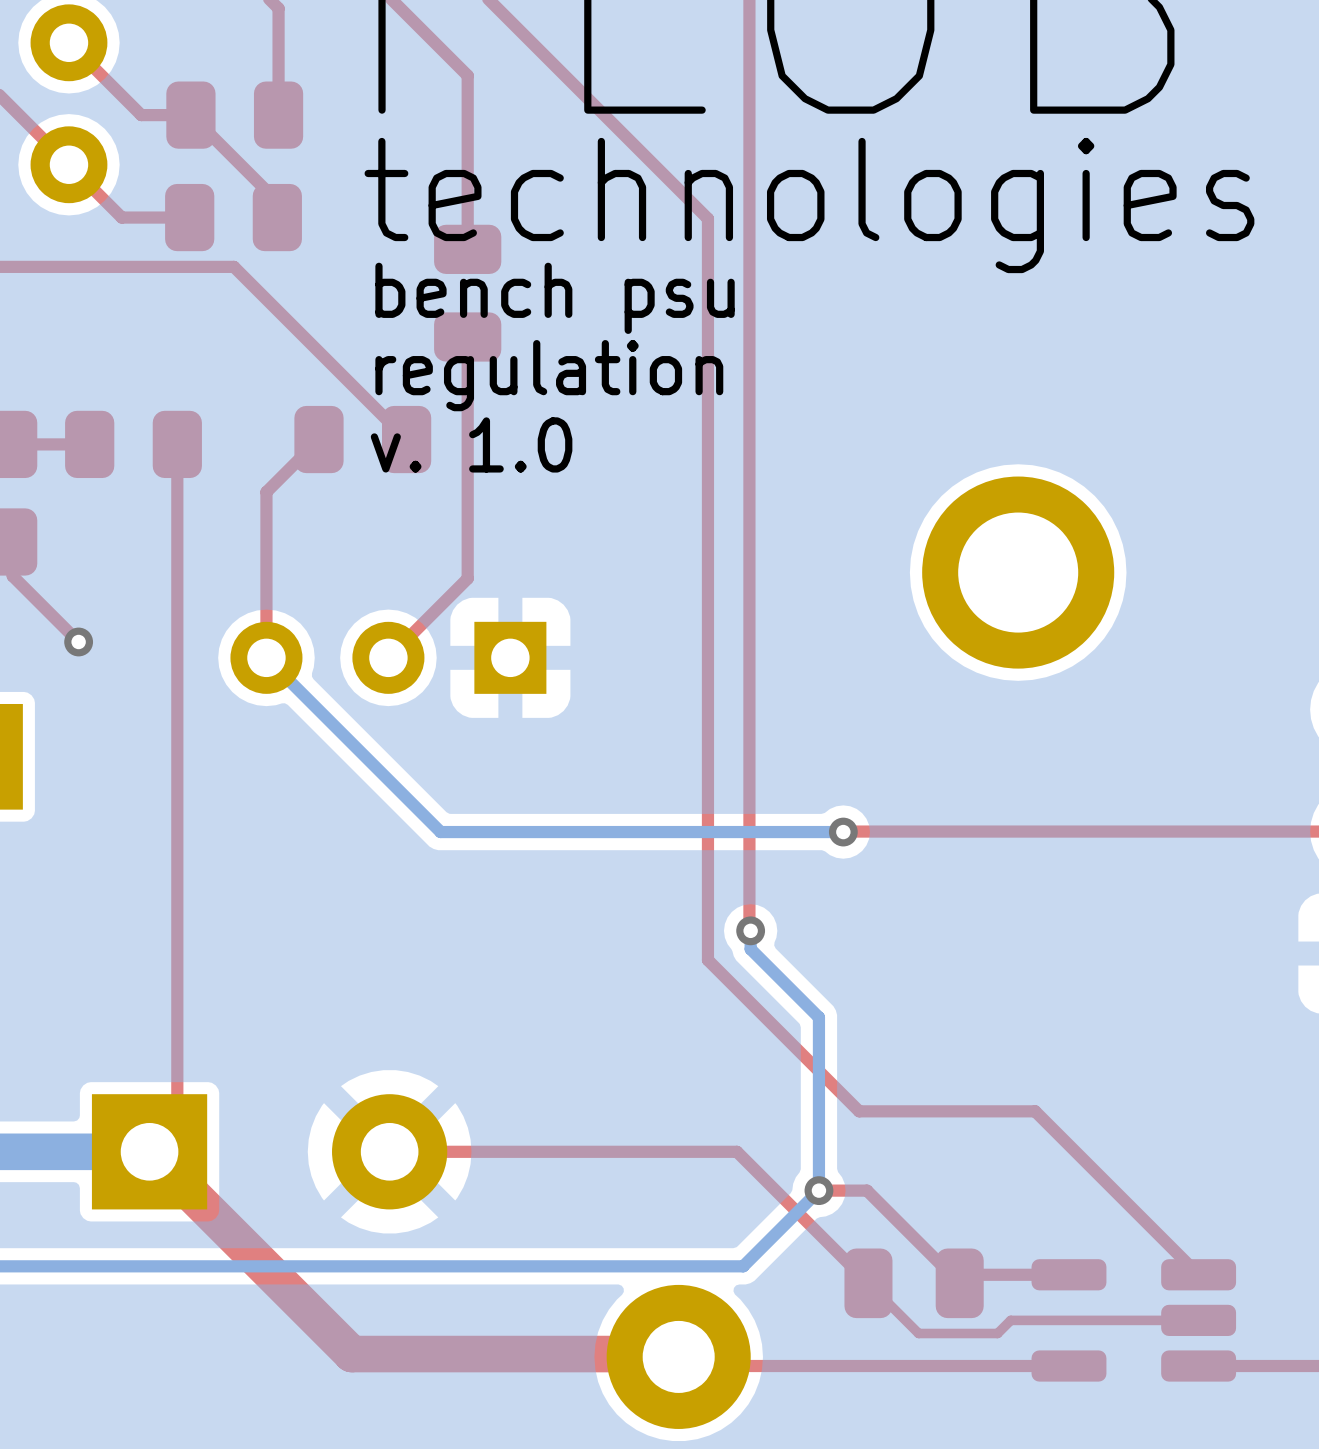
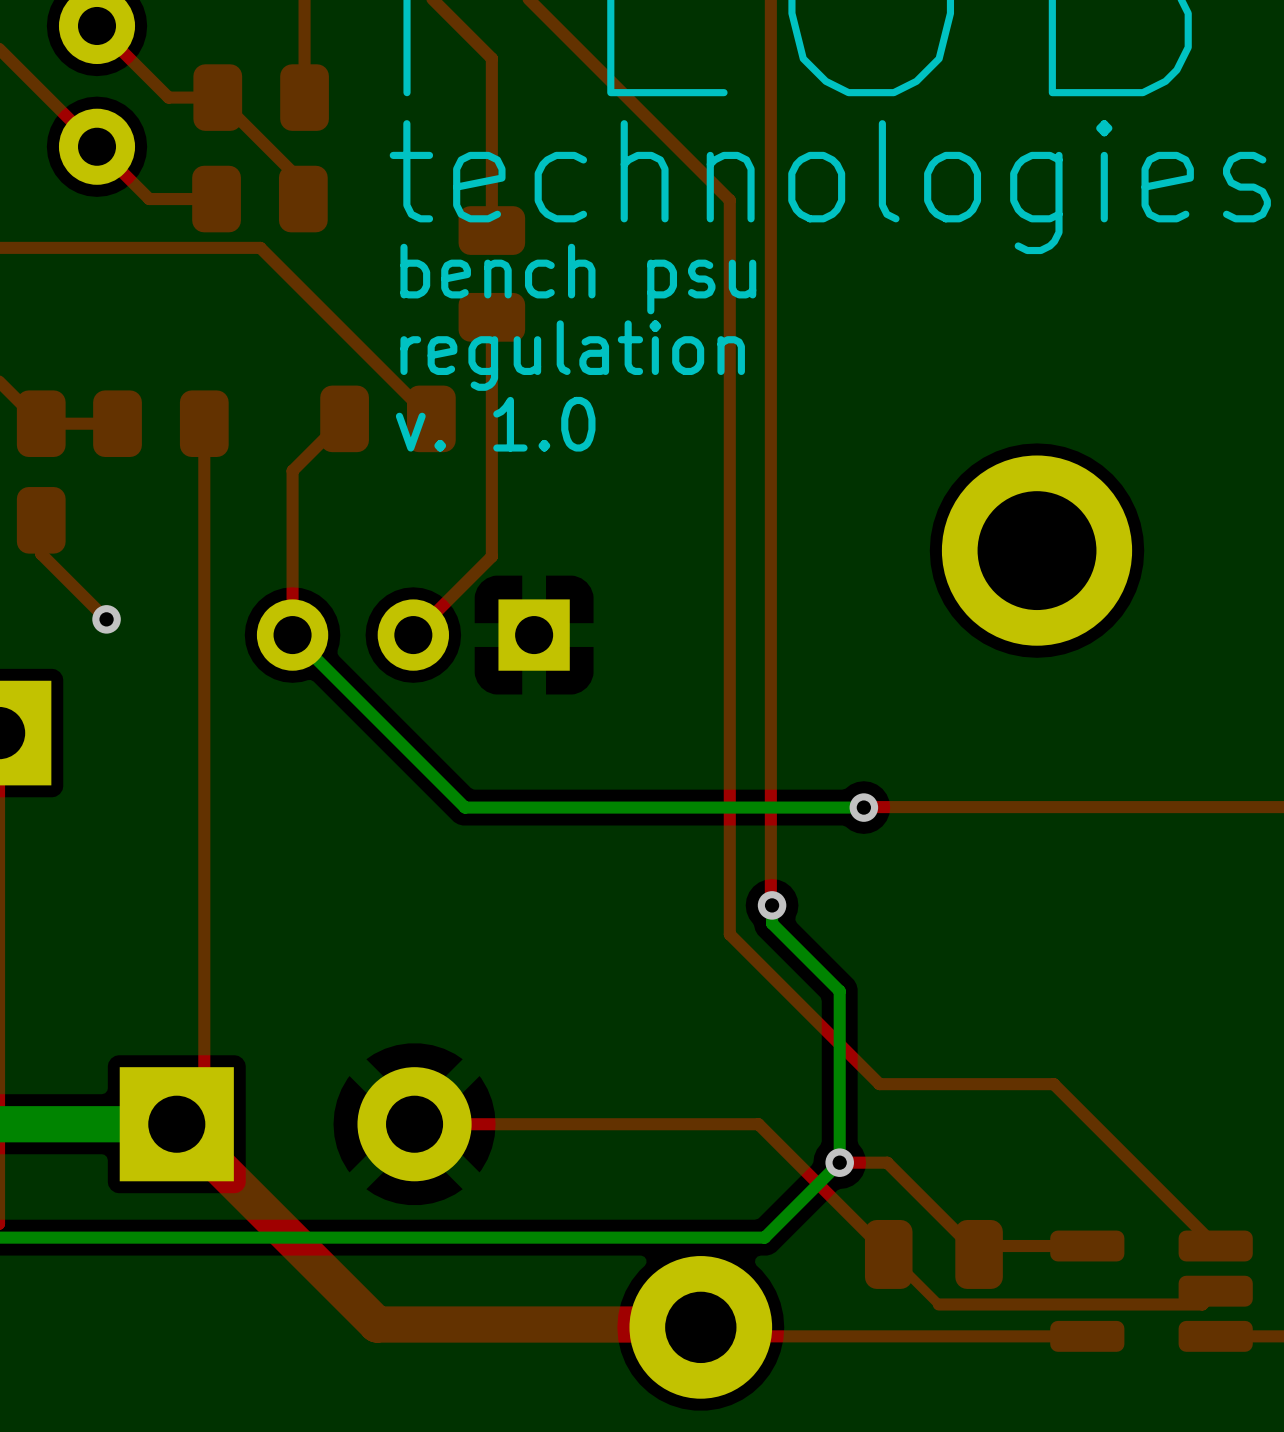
top track: (1198, 1320) (1010, 1320) (997, 1333) (918, 1333) -> (1215, 1291) (1202, 1304) (938, 1304)

